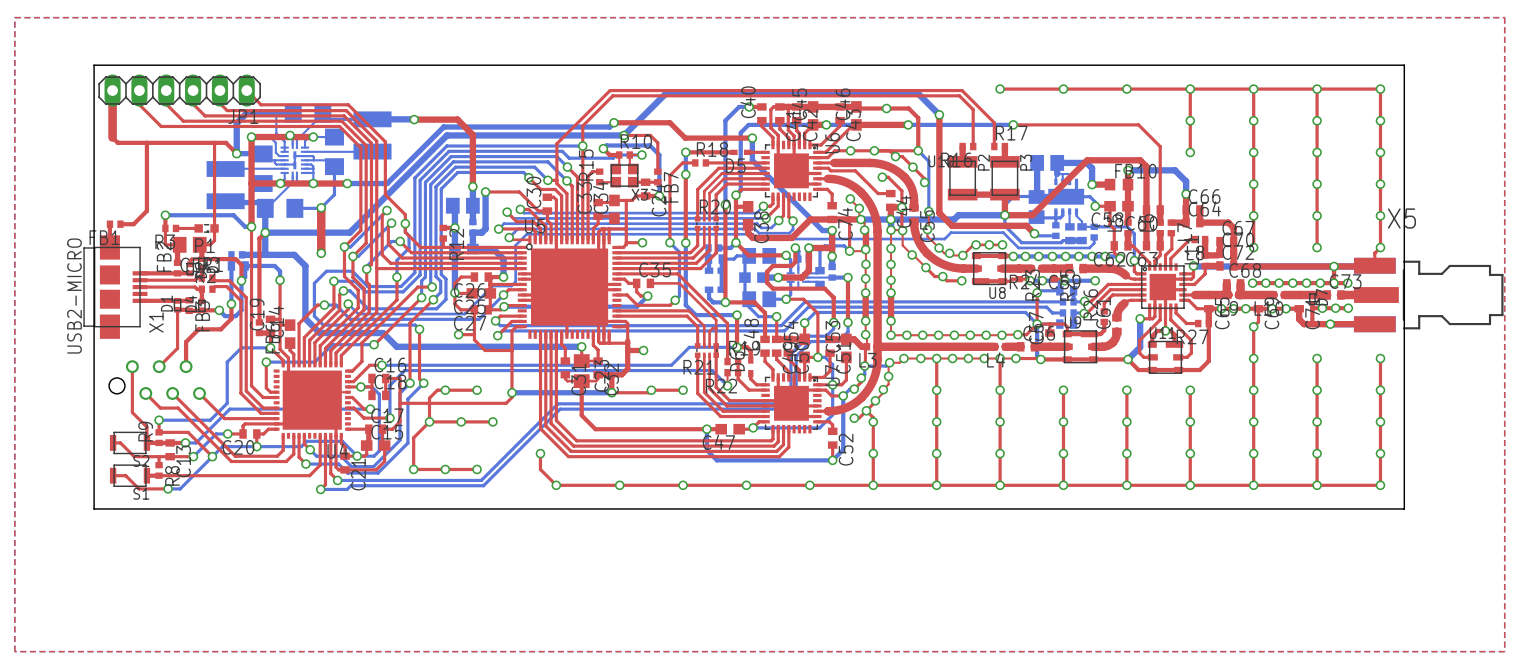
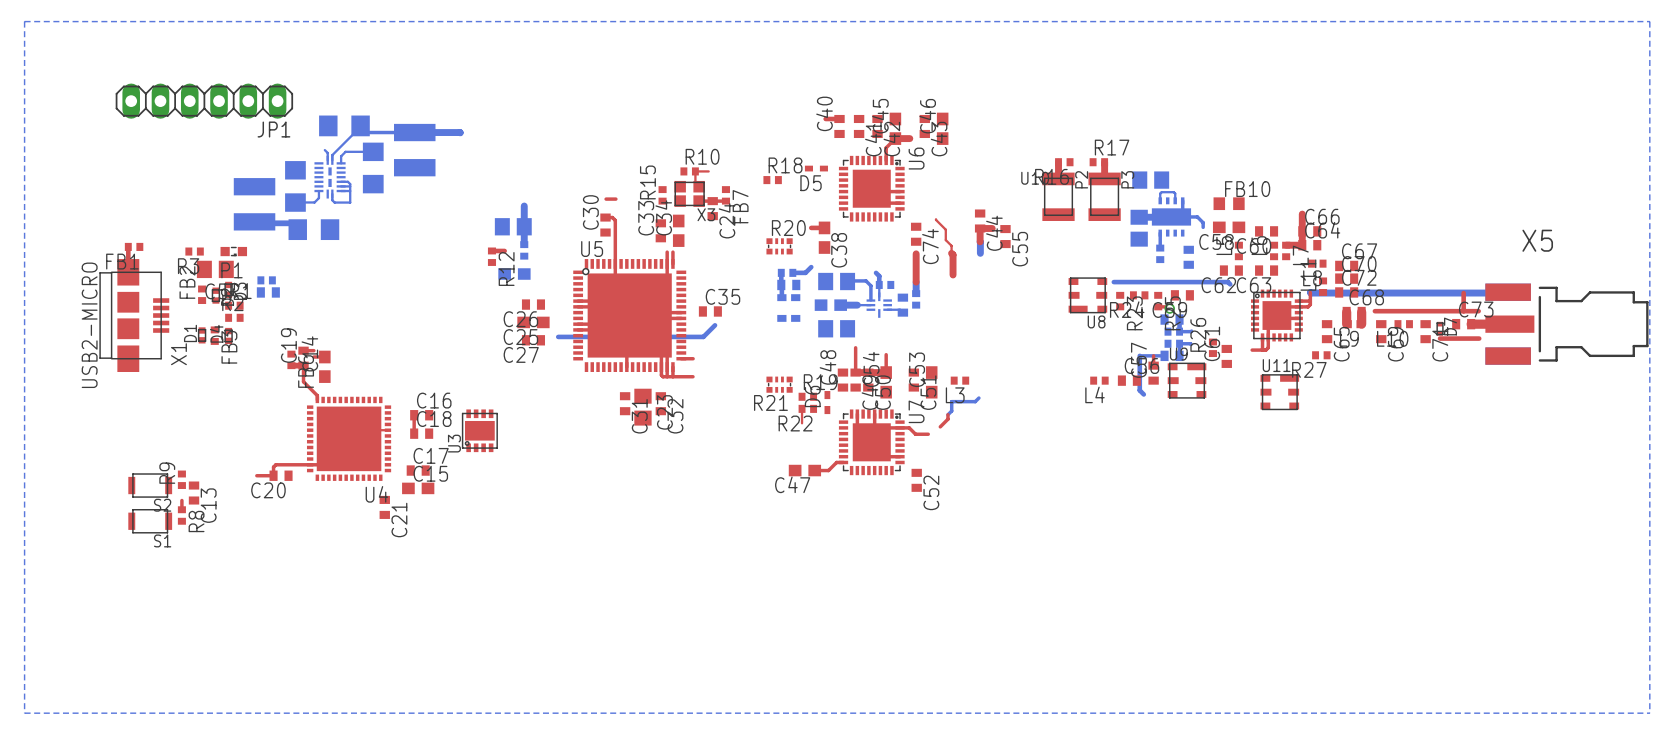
top zone outline: (14, 17) (1504, 17) (1504, 651) (14, 651) (14, 17) -> none
board edge: (94, 65) (1404, 65) (1404, 508) (94, 508) (94, 65) -> none
top track: (1000, 89) (1380, 89) (1380, 247) (1374, 253) (1374, 266) (1234, 266) (1233, 227) (1228, 222) (1199, 222) (1199, 209) -> none
via: (1000, 89) -> none
via: (1063, 89) -> none
via: (1126, 89) -> none
top track: (1190, 89) (1190, 152) -> none
via: (1190, 89) -> none
top track: (1253, 89) (1253, 247) -> none
via: (1253, 89) -> none
top track: (1317, 89) (1317, 247) -> none
via: (1317, 89) -> none
via: (1380, 89) -> none
top track: (112, 90) (112, 137) (117, 142) (225, 142) (236, 153) -> none
top track: (139, 90) (139, 104) (161, 126) (339, 126) (360, 147) (360, 230) (344, 246) (344, 276) (358, 290) (358, 307) (320, 345) (320, 364) -> none
top track: (166, 90) (166, 104) (183, 121) (341, 121) (366, 145) (366, 243) (352, 256) (352, 277) (364, 288) (364, 309) (325, 348) (325, 364) -> none
top track: (193, 90) (193, 103) (205, 115) (344, 115) (371, 143) (371, 264) (366, 269) (366, 282) (369, 284) (369, 312) (330, 350) (330, 364) -> none
top track: (219, 90) (219, 103) (227, 110) (346, 110) (376, 141) (376, 312) (336, 352) (336, 364) -> none
top track: (246, 90) (261, 104) (348, 104) (385, 141) (385, 194) (405, 214) (405, 232) (420, 247) (522, 247) -> none
bottom track: (749, 106) (739, 106) (725, 120) (725, 204) -> none
via: (749, 106) -> none
top track: (773, 106) (908, 108) (918, 118) (918, 150) (834, 150) (827, 157) (778, 157) (778, 135) (770, 127) (770, 109) (773, 106) -> none
top track: (788, 106) (788, 130) (794, 135) (794, 157) -> none
via: (886, 108) -> none
bottom track: (276, 113) (276, 133) (284, 141) (284, 151) -> none
bottom track: (293, 113) (246, 113) (236, 123) (236, 153) (262, 153) (269, 160) (284, 160) -> none
top track: (939, 114) (939, 213) (952, 225) (1026, 225) (1034, 233) -> none
bottom track: (939, 114) (918, 93) (665, 93) (623, 135) (447, 135) (349, 232) (265, 232) -> none
via: (939, 114) -> none
top track: (414, 119) (457, 119) (472, 134) (472, 186) -> none
via: (414, 119) -> none
top track: (761, 120) (761, 126) (772, 137) (772, 144) -> none
top track: (779, 120) (779, 129) (788, 138) (788, 144) -> none
top track: (796, 120) (799, 144) -> none
top track: (840, 120) (840, 125) (821, 144) (809, 144) -> none
via: (1190, 120) -> none
via: (1253, 120) -> none
via: (1317, 120) -> none
via: (1380, 120) -> none
top track: (613, 122) (669, 122) (685, 138) (752, 138) -> none
bottom track: (613, 122) (609, 127) (443, 127) (387, 183) (347, 183) -> none
via: (613, 122) -> none
via: (826, 124) -> none
top track: (908, 124) (853, 124) (825, 152) (817, 152) -> none
via: (908, 124) -> none
top track: (1013, 124) (1138, 124) (1160, 146) (1160, 222) -> none
bottom track: (1013, 124) (748, 124) (740, 132) (740, 190) (735, 195) -> none
via: (1013, 124) -> none
via: (290, 135) -> none
top track: (623, 135) (650, 135) (657, 142) (657, 171) -> none
via: (623, 135) -> none
bottom track: (251, 137) (270, 137) (275, 142) (275, 152) (279, 156) (284, 156) -> none
via: (251, 137) -> none
top track: (313, 137) (290, 135) (288, 137) (251, 137) (251, 385) (263, 397) (276, 397) -> none
via: (313, 137) -> none
bottom track: (752, 138) (752, 160) (822, 230) (832, 230) -> none
via: (752, 138) -> none
top track: (146, 142) (146, 211) (133, 224) (120, 224) -> none
top track: (214, 142) (214, 240) (210, 244) (199, 244) (201, 244) (201, 259) -> none
bottom track: (582, 146) (446, 146) (414, 178) (414, 272) (401, 286) (367, 286) (352, 271) (326, 271) (314, 283) (314, 316) (323, 325) (415, 325) (419, 329) -> none
via: (582, 146) -> none
top track: (973, 146) (973, 109) (959, 95) (612, 95) (582, 125) (582, 239) -> none
top track: (994, 146) (994, 122) (962, 90) (610, 90) (556, 143) (556, 183) (566, 193) (566, 239) -> none
top track: (603, 148) (609, 155) (619, 155) (619, 165) (615, 169) -> none
bottom track: (603, 148) (606, 145) (649, 145) (659, 155) (659, 195) -> none
via: (603, 148) -> none
via: (850, 150) -> none
via: (874, 150) -> none
top track: (889, 150) (895, 156) (902, 156) (924, 178) (924, 182) -> none
bottom track: (918, 150) (928, 161) (928, 219) -> none
via: (918, 150) -> none
bottom track: (372, 151) (305, 151) -> none
top track: (685, 152) (733, 152) -> none
bottom track: (685, 152) (685, 174) -> none
via: (685, 152) -> none
top track: (747, 152) (765, 152) -> none
via: (1190, 152) -> none
via: (1253, 152) -> none
via: (1317, 152) -> none
via: (1380, 152) -> none
via: (236, 153) -> none
bottom track: (641, 155) (616, 155) (613, 158) (569, 158) (562, 151) (449, 151) (420, 180) (420, 274) (403, 291) (365, 291) (355, 281) (333, 281) -> none
via: (641, 155) -> none
via: (895, 156) -> none
bottom track: (274, 160) (276, 164) (294, 165) (294, 155) (312, 156) (313, 160) -> none
bottom track: (305, 160) (328, 160) (334, 166) (334, 194) (320, 208) (294, 208) -> none
top track: (695, 162) (682, 162) (669, 175) (669, 242) -> none
top track: (705, 162) (765, 162) -> none
top track: (817, 162) (874, 163) (888, 166) (900, 173) (909, 183) (913, 195) (914, 207) -> none
bottom track: (1037, 162) (1037, 196) (1013, 196) (1004, 205) (1004, 225) (1021, 242) (1082, 240) -> none
top track: (567, 167) (577, 177) (577, 239) -> none
bottom track: (567, 167) (556, 156) (451, 156) (425, 182) (425, 277) (421, 280) (421, 297) -> none
via: (567, 167) -> none
via: (912, 167) -> none
bottom track: (284, 168) (225, 169) -> none
top track: (765, 168) (718, 168) (697, 189) (697, 218) -> none
top track: (817, 168) (828, 168) (830, 170) (855, 170) (878, 193) (890, 193) -> none
top track: (1128, 170) (1128, 222) -> none
bottom track: (1128, 170) (1175, 170) (1186, 181) (1186, 194) -> none
via: (1128, 170) -> none
top track: (599, 171) (592, 171) (588, 176) (588, 239) -> none
top track: (765, 173) (722, 173) (704, 191) (704, 218) -> none
top track: (685, 174) (685, 242) -> none
via: (685, 174) -> none
bottom track: (1057, 174) (1057, 162) (1086, 162) (1092, 168) (1092, 184) -> none
bottom track: (1062, 174) (1062, 181) -> none
bottom track: (292, 175) (292, 182) (265, 208) (265, 254) -> none
top track: (528, 177) (540, 189) (555, 189) (561, 195) (561, 239) -> none
bottom track: (528, 177) (523, 172) (457, 172) (441, 188) (441, 274) (445, 279) (445, 299) (436, 308) (367, 308) (350, 290) (343, 290) -> none
via: (528, 177) -> none
top track: (882, 177) (888, 177) (901, 190) (902, 230) -> none
via: (882, 177) -> none
top track: (765, 178) (723, 178) (709, 193) (709, 218) -> none
top track: (817, 178) (841, 180) (857, 189) (868, 201) (873, 210) (877, 231) (877, 359) (875, 374) (868, 389) (854, 403) (837, 410) (817, 411) -> none
bottom track: (547, 180) (534, 167) (455, 167) (435, 186) (435, 276) (440, 281) (440, 292) (433, 299) -> none
via: (547, 180) -> none
top track: (566, 180) (572, 186) (572, 239) -> none
bottom track: (566, 180) (547, 161) (453, 161) (430, 184) (432, 287) -> none
via: (566, 180) -> none
top track: (599, 182) (615, 182) -> none
via: (924, 182) -> none
top track: (251, 183) (313, 183) -> none
via: (280, 183) -> none
top track: (313, 183) (347, 183) -> none
via: (313, 183) -> none
via: (347, 183) -> none
top track: (765, 184) (727, 184) (716, 194) (716, 218) -> none
top track: (1092, 184) (1110, 184) -> none
via: (1092, 184) -> none
via: (1253, 184) -> none
via: (1317, 184) -> none
via: (1380, 184) -> none
via: (472, 186) -> none
top track: (765, 189) (741, 189) (735, 195) (735, 242) (748, 255) (786, 255) -> none
top track: (817, 189) (827, 189) (832, 194) (832, 205) -> none
top track: (485, 191) (519, 191) (538, 211) (547, 211) (547, 220) (551, 224) (551, 239) -> none
bottom track: (485, 191) (485, 228) (481, 232) (472, 232) (472, 249) (493, 249) (503, 259) (503, 277) -> none
via: (485, 191) -> none
top track: (962, 194) (1004, 194) (1004, 215) (1032, 215) (1087, 160) (1140, 160) (1146, 166) (1146, 245) -> none
via: (1186, 194) -> none
top track: (659, 195) (636, 195) (632, 200) (598, 202) -> none
via: (659, 195) -> none
via: (735, 195) -> none
top track: (772, 196) (772, 203) (770, 206) (763, 206) -> none
top track: (778, 196) (778, 206) (766, 218) -> none
top track: (783, 196) (783, 215) (778, 220) -> none
top track: (788, 196) (788, 216) (793, 221) -> none
via: (850, 198) -> none
top track: (626, 200) (626, 244) (623, 247) (616, 247) -> none
top track: (725, 204) (725, 302) (754, 302) (765, 312) (765, 339) -> none
via: (725, 204) -> none
bottom track: (452, 205) (454, 207) (454, 292) -> none
bottom track: (763, 206) (756, 213) (524, 213) (520, 209) -> none
via: (763, 206) -> none
top track: (1095, 206) (1110, 206) (1110, 224) (1114, 228) (1114, 252) (1120, 258) -> none
via: (1095, 206) -> none
top track: (321, 207) (321, 253) -> none
via: (321, 207) -> none
via: (901, 207) -> none
via: (859, 208) -> none
top track: (520, 209) (528, 209) (545, 226) (545, 239) -> none
via: (520, 209) -> none
top track: (386, 210) (382, 215) (382, 254) (390, 263) (522, 263) -> none
bottom track: (386, 210) (350, 246) (344, 246) -> none
via: (386, 210) -> none
top track: (928, 211) (927, 236) (944, 253) (962, 255) (973, 244) (1002, 244) -> none
via: (928, 211) -> none
bottom track: (1062, 211) (1060, 217) (1036, 217) -> none
bottom track: (1069, 211) (1069, 226) -> none
bottom track: (1076, 211) (1076, 216) (1082, 221) (1082, 226) (1127, 226) (1134, 233) (1134, 260) -> none
top track: (507, 212) (516, 221) (533, 221) (540, 228) (540, 239) -> none
bottom track: (507, 212) (513, 218) (766, 218) -> none
via: (507, 212) -> none
top track: (165, 215) (165, 244) (179, 244) (177, 244) (177, 262) -> none
bottom track: (165, 215) (233, 215) (245, 226) (251, 226) -> none
via: (165, 215) -> none
bottom track: (1004, 215) (958, 215) (954, 219) (860, 219) -> none
via: (1004, 215) -> none
via: (1253, 215) -> none
via: (1317, 215) -> none
via: (1380, 215) -> none
top track: (614, 218) (612, 216) (598, 216) (598, 223) (593, 228) (593, 239) -> none
via: (766, 218) -> none
top track: (849, 219) (849, 251) (865, 249) (867, 346) -> none
top track: (860, 219) (810, 219) (791, 237) (752, 237) (748, 233) (748, 224) -> none
via: (860, 219) -> none
via: (890, 219) -> none
bottom track: (778, 220) (771, 227) (761, 227) (757, 223) (504, 223) (498, 229) -> none
via: (778, 220) -> none
bottom track: (793, 221) (793, 229) (789, 233) (759, 233) (754, 228) (517, 228) (509, 237) -> none
via: (793, 221) -> none
top track: (914, 221) (919, 242) (931, 256) (948, 266) (976, 268) -> none
top track: (391, 223) (388, 226) (388, 244) (402, 258) (522, 258) -> none
bottom track: (391, 223) (358, 256) (352, 256) -> none
via: (391, 223) -> none
bottom track: (405, 223) (405, 232) (409, 235) (409, 248) (396, 260) (396, 277) -> none
via: (405, 223) -> none
via: (251, 226) -> none
via: (454, 227) -> none
top track: (175, 228) (198, 228) -> none
top track: (498, 228) (533, 228) (535, 231) (535, 239) -> none
top track: (626, 228) (601, 228) (598, 232) (598, 284) -> none
top track: (697, 228) (697, 245) (690, 252) (616, 252) -> none
top track: (704, 228) (704, 246) (693, 258) (616, 258) -> none
top track: (709, 228) (709, 250) (696, 263) (616, 263) -> none
top track: (716, 228) (716, 253) (700, 268) (616, 268) -> none
via: (498, 229) -> none
via: (927, 229) -> none
via: (832, 230) -> none
via: (864, 230) -> none
via: (891, 230) -> none
top track: (902, 230) (891, 230) (891, 335) (1026, 334) (1037, 324) -> none
top track: (902, 230) (902, 245) (934, 276) (942, 276) (947, 280) (961, 280) -> none
via: (902, 230) -> none
top track: (265, 232) (259, 238) (259, 322) -> none
via: (265, 232) -> none
part: (1094, 232) -> none
bottom track: (1034, 233) (1036, 235) (1055, 235) -> none
via: (1034, 233) -> none
part: (1069, 233) -> none
top track: (1128, 233) (1128, 245) (1132, 245) (1149, 262) (1149, 267) -> none
top track: (1160, 233) (1160, 255) (1154, 260) (1154, 267) -> none
top track: (1171, 233) (1171, 248) (1165, 255) (1165, 267) -> none
top track: (509, 237) (511, 239) (529, 239) -> none
via: (509, 237) -> none
bottom track: (1094, 237) (1094, 243) (1089, 247) (1018, 247) (1003, 232) (951, 232) (944, 239) (757, 239) (752, 234) (526, 234) (515, 245) (515, 281) (511, 286) (492, 286) (464, 314) (358, 314) (348, 303) -> none
top track: (443, 238) (442, 247) -> none
top track: (1194, 239) (1189, 239) (1170, 258) (1170, 267) -> none
top track: (1205, 239) (1205, 255) (1217, 255) (1219, 253) (1219, 241) -> none
top track: (400, 241) (411, 252) (522, 252) -> none
bottom track: (400, 241) (391, 241) (366, 266) (366, 269) -> none
via: (400, 241) -> none
top track: (626, 242) (642, 242) -> none
via: (642, 242) -> none
bottom track: (669, 242) (679, 252) (679, 296) (675, 300) -> none
via: (669, 242) -> none
bottom track: (685, 242) (685, 305) (695, 315) (737, 315) -> none
via: (685, 242) -> none
via: (735, 242) -> none
via: (976, 244) -> none
via: (989, 244) -> none
via: (1002, 244) -> none
via: (344, 246) -> none
via: (808, 247) -> none
top track: (832, 247) (808, 247) (808, 270) (802, 277) (778, 277) -> none
via: (1253, 247) -> none
via: (1317, 247) -> none
via: (1380, 247) -> none
top track: (795, 248) (795, 262) (791, 265) (772, 265) (767, 271) (767, 282) (772, 288) (824, 288) (833, 297) (833, 322) -> none
via: (795, 248) -> none
via: (891, 248) -> none
via: (939, 248) -> none
via: (865, 249) -> none
bottom track: (849, 251) (844, 245) (824, 245) (819, 250) (819, 270) (817, 273) (805, 273) -> none
via: (849, 251) -> none
via: (321, 253) -> none
via: (949, 253) -> none
bottom track: (231, 254) (231, 303) -> none
bottom track: (242, 254) (294, 254) (305, 265) (305, 318) (319, 333) (383, 333) (396, 346) (581, 346) -> none
via: (912, 254) -> none
via: (786, 255) -> none
via: (962, 255) -> none
top track: (976, 255) (1013, 256) -> none
via: (352, 256) -> none
via: (832, 256) -> none
via: (1013, 256) -> none
via: (1025, 256) -> none
via: (1038, 256) -> none
via: (1052, 256) -> none
via: (1065, 256) -> none
via: (1078, 256) -> none
via: (1092, 256) -> none
via: (1105, 256) -> none
via: (1120, 258) -> none
top track: (201, 259) (191, 259) (190, 264) -> none
top track: (201, 259) (235, 259) (241, 264) (241, 280) -> none
top track: (1134, 260) (1134, 271) (1136, 273) (1142, 273) -> none
via: (1134, 260) -> none
via: (865, 264) -> none
via: (891, 264) -> none
via: (1193, 265) -> none
top track: (1219, 265) (1205, 265) (1205, 273) (1194, 284) (1182, 284) -> none
via: (1334, 266) -> none
via: (925, 267) -> none
top track: (201, 268) (201, 278) (194, 280) (140, 280) -> none
top track: (376, 268) (522, 268) -> none
top track: (1002, 268) (1031, 268) -> none
top track: (1041, 268) (1069, 268) -> none
top track: (1083, 268) (1112, 268) (1129, 278) (1142, 279) -> none
via: (366, 269) -> none
top track: (140, 273) (190, 273) -> none
top track: (616, 273) (677, 273) (727, 323) (727, 361) -> none
via: (942, 276) -> none
top track: (396, 277) (396, 299) (341, 355) (341, 364) -> none
via: (396, 277) -> none
top track: (474, 277) (461, 277) (454, 283) (454, 303) (460, 309) (474, 309) (474, 339) (485, 350) (511, 350) -> none
top track: (503, 277) (488, 277) (490, 279) (490, 307) (488, 309) (500, 309) (505, 305) (522, 305) -> none
via: (503, 277) -> none
via: (778, 277) -> none
bottom track: (805, 277) (847, 277) -> none
top track: (847, 277) (847, 322) -> none
via: (847, 277) -> none
top track: (212, 278) (215, 280) (229, 280) (246, 297) (246, 390) (263, 408) (276, 408) -> none
via: (865, 278) -> none
top track: (616, 279) (624, 279) (628, 283) (636, 283) (636, 291) (640, 296) (647, 296) -> none
via: (241, 280) -> none
top track: (280, 280) (280, 349) (288, 357) (288, 400) (336, 400) (336, 467) (338, 469) (376, 469) (384, 461) (382, 429) (392, 429) (399, 421) (399, 378) (385, 378) (385, 395) -> none
bottom track: (280, 280) (280, 271) (274, 265) (245, 265) (245, 277) (241, 280) (241, 310) (235, 316) (225, 316) (219, 310) -> none
via: (280, 280) -> none
via: (891, 280) -> none
via: (961, 280) -> none
top track: (1030, 280) (1012, 279) (1010, 281) (980, 281) -> none
bottom track: (1030, 280) (1095, 280) -> none
via: (1030, 280) -> none
via: (1042, 280) -> none
bottom track: (1059, 280) (1059, 290) (1039, 290) (1037, 292) -> none
via: (1095, 280) -> none
top track: (333, 281) (333, 307) (304, 337) (304, 364) -> none
via: (333, 281) -> none
bottom track: (790, 281) (790, 294) (786, 299) (769, 299) -> none
top track: (650, 283) (679, 283) (716, 320) (716, 387) (729, 400) (791, 400) -> none
via: (1252, 283) -> none
via: (1265, 283) -> none
via: (1279, 283) -> none
via: (1292, 283) -> none
via: (1306, 283) -> none
via: (1320, 283) -> none
via: (1334, 283) -> none
via: (1347, 283) -> none
top track: (490, 284) (522, 284) -> none
top track: (1142, 284) (1108, 284) (1091, 301) (1084, 301) -> none
top track: (140, 287) (194, 287) (201, 289) (201, 301) -> none
top track: (432, 287) (417, 287) (361, 343) (361, 361) (352, 371) (347, 371) -> none
via: (432, 287) -> none
top track: (1162, 287) (1165, 289) (1165, 330) -> none
top track: (212, 289) (215, 286) (226, 286) (240, 300) (240, 393) (261, 413) (276, 413) -> none
top track: (522, 289) (508, 289) (503, 295) -> none
bottom track: (709, 289) (709, 298) (713, 302) (725, 302) -> none
bottom track: (721, 289) (721, 259) (733, 259) (737, 255) (749, 255) (744, 260) (744, 295) (749, 299) (749, 307) (758, 316) (776, 316) -> none
top track: (1142, 289) (1110, 289) (1086, 313) (1084, 313) -> none
top track: (343, 290) (339, 294) (339, 310) (309, 340) (309, 364) -> none
via: (343, 290) -> none
via: (454, 292) -> none
via: (865, 292) -> none
via: (891, 292) -> none
top track: (1037, 292) (1037, 324) -> none
via: (1037, 292) -> none
top track: (454, 293) (472, 293) -> none
bottom track: (503, 295) (479, 319) (350, 319) (335, 305) (324, 305) -> none
via: (503, 295) -> none
top track: (616, 295) (627, 295) (637, 305) (670, 305) (675, 300) -> none
top track: (1142, 295) (1112, 295) (1104, 303) (1104, 311) -> none
top track: (1182, 295) (1228, 295) -> none
top track: (1238, 295) (1273, 295) -> none
top track: (1284, 295) (1327, 295) -> none
via: (647, 296) -> none
top track: (421, 297) (374, 344) -> none
via: (421, 297) -> none
top track: (433, 299) (410, 323) (410, 383) -> none
via: (433, 299) -> none
top track: (786, 299) (803, 299) (817, 313) (817, 357) (804, 357) (804, 377) -> none
via: (786, 299) -> none
top track: (189, 300) (140, 300) -> none
via: (675, 300) -> none
top track: (1142, 300) (1125, 302) (1119, 309) (1116, 317) -> none
top track: (1182, 300) (1188, 300) (1197, 308) (1208, 308) -> none
bottom track: (1063, 301) (805, 301) (781, 325) (500, 325) (495, 320) -> none
via: (1084, 301) -> none
via: (725, 302) -> none
top track: (231, 303) (231, 318) (220, 329) (198, 329) (186, 341) (186, 366) -> none
via: (231, 303) -> none
top track: (348, 303) (348, 309) (314, 342) (314, 364) -> none
via: (348, 303) -> none
top track: (1312, 303) (1312, 324) -> none
top track: (324, 305) (317, 305) (299, 323) (299, 364) -> none
via: (324, 305) -> none
via: (504, 306) -> none
top track: (1160, 307) (1160, 319) (1139, 340) (1139, 353) (1143, 357) (1152, 357) -> none
top track: (1170, 307) (1170, 319) (1191, 340) (1191, 353) (1187, 357) (1178, 357) -> none
top track: (1176, 307) (1176, 312) (1186, 323) (1198, 323) -> none
top track: (1208, 308) (1208, 361) (1199, 370) (1138, 370) (1128, 359) (903, 358) (899, 362) (888, 363) (888, 384) (883, 389) (883, 392) (859, 418) (854, 418) -> none
top track: (1208, 308) (1299, 308) (1299, 319) (1304, 324) (1374, 324) -> none
via: (1221, 308) -> none
via: (1233, 308) -> none
via: (1245, 308) -> none
top track: (1258, 308) (1258, 322) (1253, 326) (1253, 485) -> none
via: (1272, 308) -> none
via: (1285, 308) -> none
via: (1322, 308) -> none
via: (1335, 308) -> none
via: (1348, 308) -> none
top track: (219, 310) (177, 309) (177, 348) (159, 366) -> none
via: (219, 310) -> none
top track: (616, 310) (688, 310) (704, 326) (704, 345) -> none
bottom track: (1063, 312) (1052, 312) (1046, 307) (808, 307) (784, 330) (502, 330) (497, 335) -> none
via: (1084, 313) -> none
top track: (737, 315) (737, 347) (747, 347) (750, 351) (750, 359) -> none
via: (737, 315) -> none
top track: (522, 316) (500, 316) (495, 320) -> none
top track: (616, 316) (687, 316) (697, 326) (697, 345) -> none
via: (776, 316) -> none
bottom track: (1140, 318) (1140, 347) (1128, 359) -> none
via: (1140, 318) -> none
via: (495, 320) -> none
via: (865, 320) -> none
via: (891, 320) -> none
top track: (522, 321) (511, 321) (497, 335) -> none
top track: (603, 321) (625, 321) (627, 323) (627, 368) (621, 374) (598, 374) (595, 381) (567, 381) (565, 374) -> none
top track: (1104, 321) (1104, 330) (1100, 334) (1067, 334) (1067, 326) (1064, 324) (1037, 324) -> none
bottom track: (833, 322) (833, 328) (826, 336) (808, 336) (790, 354) (790, 388) (775, 403) (557, 403) (481, 480) (337, 480) -> none
via: (833, 322) -> none
bottom track: (847, 322) (847, 331) (838, 341) (811, 341) (796, 356) (796, 391) (778, 409) (560, 409) (483, 485) (350, 485) (347, 489) (320, 489) -> none
via: (847, 322) -> none
bottom track: (804, 323) (815, 312) (1025, 312) (1037, 324) -> none
via: (804, 323) -> none
via: (1037, 324) -> none
via: (1330, 324) -> none
top track: (522, 326) (516, 326) (511, 330) (511, 397) (506, 403) (399, 403) -> none
via: (1253, 326) -> none
top track: (716, 328) (709, 331) (709, 345) -> none
top track: (419, 329) (419, 379) (423, 383) -> none
via: (419, 329) -> none
via: (1165, 330) -> none
top track: (1116, 331) (1114, 339) (1109, 344) (1093, 346) -> none
top track: (458, 334) (474, 334) -> none
via: (458, 334) -> none
top track: (540, 334) (540, 428) (568, 456) (779, 456) (788, 447) (788, 429) -> none
top track: (545, 334) (545, 426) (571, 451) (776, 451) (783, 444) (783, 429) -> none
top track: (551, 334) (551, 423) (573, 446) (774, 446) (778, 441) (778, 429) -> none
top track: (556, 334) (556, 420) (576, 440) (771, 440) (772, 429) -> none
top track: (561, 334) (561, 344) (565, 348) (565, 361) -> none
top track: (593, 334) (593, 345) (598, 350) (598, 361) (581, 361) (581, 346) -> none
via: (865, 334) -> none
via: (1017, 334) -> none
via: (497, 335) -> none
via: (891, 335) -> none
via: (906, 335) -> none
via: (922, 335) -> none
via: (938, 335) -> none
via: (954, 335) -> none
via: (970, 335) -> none
via: (986, 335) -> none
via: (1001, 335) -> none
top track: (830, 339) (854, 339) (861, 346) (867, 346) -> none
top track: (290, 343) (290, 350) (293, 354) (293, 364) -> none
bottom track: (374, 344) (332, 344) (314, 362) (266, 362) -> none
via: (374, 344) -> none
top track: (1152, 344) (1152, 335) (1157, 330) (1170, 330) (1174, 334) (1174, 344) -> none
via: (581, 346) -> none
top track: (867, 346) (864, 366) -> none
top track: (877, 346) (994, 346) -> none
top track: (1005, 346) (1020, 346) -> none
top track: (1034, 346) (1067, 346) -> none
bottom track: (270, 347) (241, 347) (227, 362) (227, 403) (210, 420) (159, 420) -> none
via: (270, 347) -> none
bottom track: (737, 347) (689, 347) (671, 365) (382, 365) -> none
via: (737, 347) -> none
top track: (627, 350) (643, 350) -> none
via: (643, 350) -> none
top track: (765, 353) (765, 361) (772, 369) (772, 377) -> none
top track: (776, 353) (776, 359) (788, 371) (788, 377) -> none
top track: (788, 353) (788, 358) (799, 370) (799, 377) -> none
top track: (830, 353) (830, 371) (823, 377) (809, 377) -> none
top track: (697, 355) (697, 393) (720, 416) (765, 416) -> none
top track: (704, 355) (704, 392) (723, 411) (765, 411) -> none
top track: (709, 355) (709, 388) (727, 405) (817, 405) -> none
bottom track: (817, 357) (825, 357) (832, 364) (832, 414) (819, 427) (753, 427) -> none
via: (817, 357) -> none
top track: (846, 357) (846, 380) (841, 384) (817, 384) -> none
via: (903, 358) -> none
via: (920, 358) -> none
top track: (936, 358) (936, 485) -> none
via: (936, 358) -> none
via: (952, 358) -> none
via: (968, 358) -> none
via: (984, 358) -> none
top track: (1000, 358) (1000, 485) -> none
via: (1000, 358) -> none
via: (1015, 358) -> none
via: (1253, 358) -> none
top track: (1317, 358) (1317, 485) -> none
via: (1317, 358) -> none
top track: (1380, 358) (1380, 485) (556, 485) (540, 469) (540, 453) -> none
via: (1380, 358) -> none
via: (1040, 359) -> none
via: (1128, 359) -> none
top track: (738, 361) (738, 379) (749, 390) (765, 390) -> none
top track: (266, 362) (266, 387) (270, 392) (276, 392) -> none
via: (266, 362) -> none
via: (889, 362) -> none
top track: (382, 365) (369, 365) (353, 381) (347, 381) -> none
via: (382, 365) -> none
top track: (132, 366) (132, 412) (146, 427) (146, 442) (185, 442) -> none
via: (864, 366) -> none
top track: (750, 373) (750, 379) (756, 384) (765, 384) -> none
top track: (611, 374) (611, 392) (683, 390) -> none
via: (888, 376) -> none
via: (861, 378) -> none
part: (157, 380) -> none
top track: (581, 381) (581, 415) (595, 429) (721, 429) -> none
bottom track: (410, 383) (399, 393) (399, 440) (373, 466) (351, 466) (340, 456) (316, 456) (310, 449) -> none
via: (410, 383) -> none
bottom track: (423, 383) (407, 399) (407, 443) (377, 473) (347, 473) (338, 464) (305, 464) -> none
via: (423, 383) -> none
via: (832, 384) -> none
bottom track: (727, 385) (712, 370) (404, 370) (389, 385) (389, 418) -> none
via: (727, 385) -> none
top track: (347, 386) (371, 386) -> none
bottom track: (360, 386) (371, 386) (379, 394) (379, 450) (374, 456) (357, 456) (342, 441) (306, 441) (301, 446) (222, 446) (180, 488) (168, 488) -> none
via: (360, 386) -> none
bottom track: (854, 389) (850, 389) (843, 395) (843, 449) (832, 460) (716, 460) (706, 450) (706, 429) -> none
via: (854, 389) -> none
via: (883, 389) -> none
via: (445, 390) -> none
top track: (477, 390) (437, 390) (429, 398) (429, 421) -> none
via: (477, 390) -> none
via: (651, 390) -> none
via: (683, 390) -> none
via: (936, 390) -> none
via: (1000, 390) -> none
top track: (1063, 390) (1063, 485) -> none
via: (1063, 390) -> none
top track: (1126, 390) (1126, 485) -> none
via: (1126, 390) -> none
top track: (1190, 390) (1190, 485) -> none
via: (1190, 390) -> none
via: (1253, 390) -> none
via: (1317, 390) -> none
via: (1380, 390) -> none
U3: none -> (479, 430)
bottom track: (511, 392) (611, 392) -> none
via: (511, 392) -> none
via: (611, 392) -> none
top track: (145, 393) (160, 408) (178, 408) (231, 461) (286, 461) (293, 454) (293, 435) -> none
top track: (172, 393) (235, 456) (277, 456) (283, 450) (283, 435) -> none
top track: (199, 393) (224, 418) (276, 418) -> none
via: (843, 395) -> none
top track: (347, 397) (352, 397) (364, 409) (370, 409) -> none
via: (875, 400) -> none
top track: (347, 408) (353, 408) (363, 418) (389, 418) -> none
bottom track: (370, 409) (229, 409) (196, 442) (185, 442) -> none
via: (370, 409) -> none
top track: (866, 410) (873, 417) (873, 485) -> none
via: (866, 410) -> none
via: (389, 418) -> none
via: (854, 418) -> none
top track: (159, 420) (159, 432) (188, 432) (212, 456) -> none
via: (159, 420) -> none
top track: (429, 421) (492, 421) -> none
top track: (429, 421) (413, 437) (413, 469) (477, 469) -> none
via: (429, 421) -> none
via: (461, 421) -> none
via: (492, 421) -> none
top track: (817, 421) (829, 421) (832, 424) (832, 431) -> none
via: (873, 421) -> none
via: (936, 421) -> none
via: (1000, 421) -> none
via: (1063, 421) -> none
via: (1126, 421) -> none
via: (1190, 421) -> none
via: (1253, 421) -> none
via: (1317, 421) -> none
via: (1380, 421) -> none
via: (753, 427) -> none
top track: (276, 429) (268, 429) (263, 433) (256, 433) (256, 446) -> none
top track: (347, 429) (368, 429) (368, 445) (366, 445) (366, 454) (364, 456) (345, 456) (345, 446) (341, 443) (341, 435) -> none
via: (706, 429) -> none
bottom track: (227, 433) (216, 433) (193, 456) -> none
via: (227, 433) -> none
top track: (299, 435) (299, 457) (305, 464) -> none
top track: (304, 435) (304, 443) (310, 449) -> none
top track: (320, 435) (320, 465) (309, 475) (146, 475) -> none
top track: (325, 435) (325, 484) (320, 489) -> none
top track: (330, 435) (330, 473) (337, 480) -> none
top track: (113, 442) (120, 442) (134, 456) (193, 456) -> none
via: (185, 442) -> none
top track: (832, 445) (832, 460) -> none
via: (256, 446) -> none
via: (310, 449) -> none
via: (540, 453) -> none
via: (873, 453) -> none
via: (936, 453) -> none
via: (1000, 453) -> none
via: (1063, 453) -> none
via: (1126, 453) -> none
via: (1190, 453) -> none
via: (1253, 453) -> none
via: (1317, 453) -> none
via: (1380, 453) -> none
via: (193, 456) -> none
via: (212, 456) -> none
via: (357, 456) -> none
via: (832, 460) -> none
via: (305, 464) -> none
via: (413, 469) -> none
via: (445, 469) -> none
via: (477, 469) -> none
top track: (113, 475) (125, 475) (138, 488) (168, 488) -> none
via: (337, 480) -> none
via: (556, 485) -> none
via: (619, 485) -> none
via: (683, 485) -> none
via: (746, 485) -> none
via: (809, 485) -> none
via: (873, 485) -> none
via: (936, 485) -> none
via: (1000, 485) -> none
via: (1063, 485) -> none
via: (1126, 485) -> none
via: (1190, 485) -> none
via: (1253, 485) -> none
via: (1317, 485) -> none
via: (1380, 485) -> none
via: (168, 488) -> none
via: (320, 489) -> none

